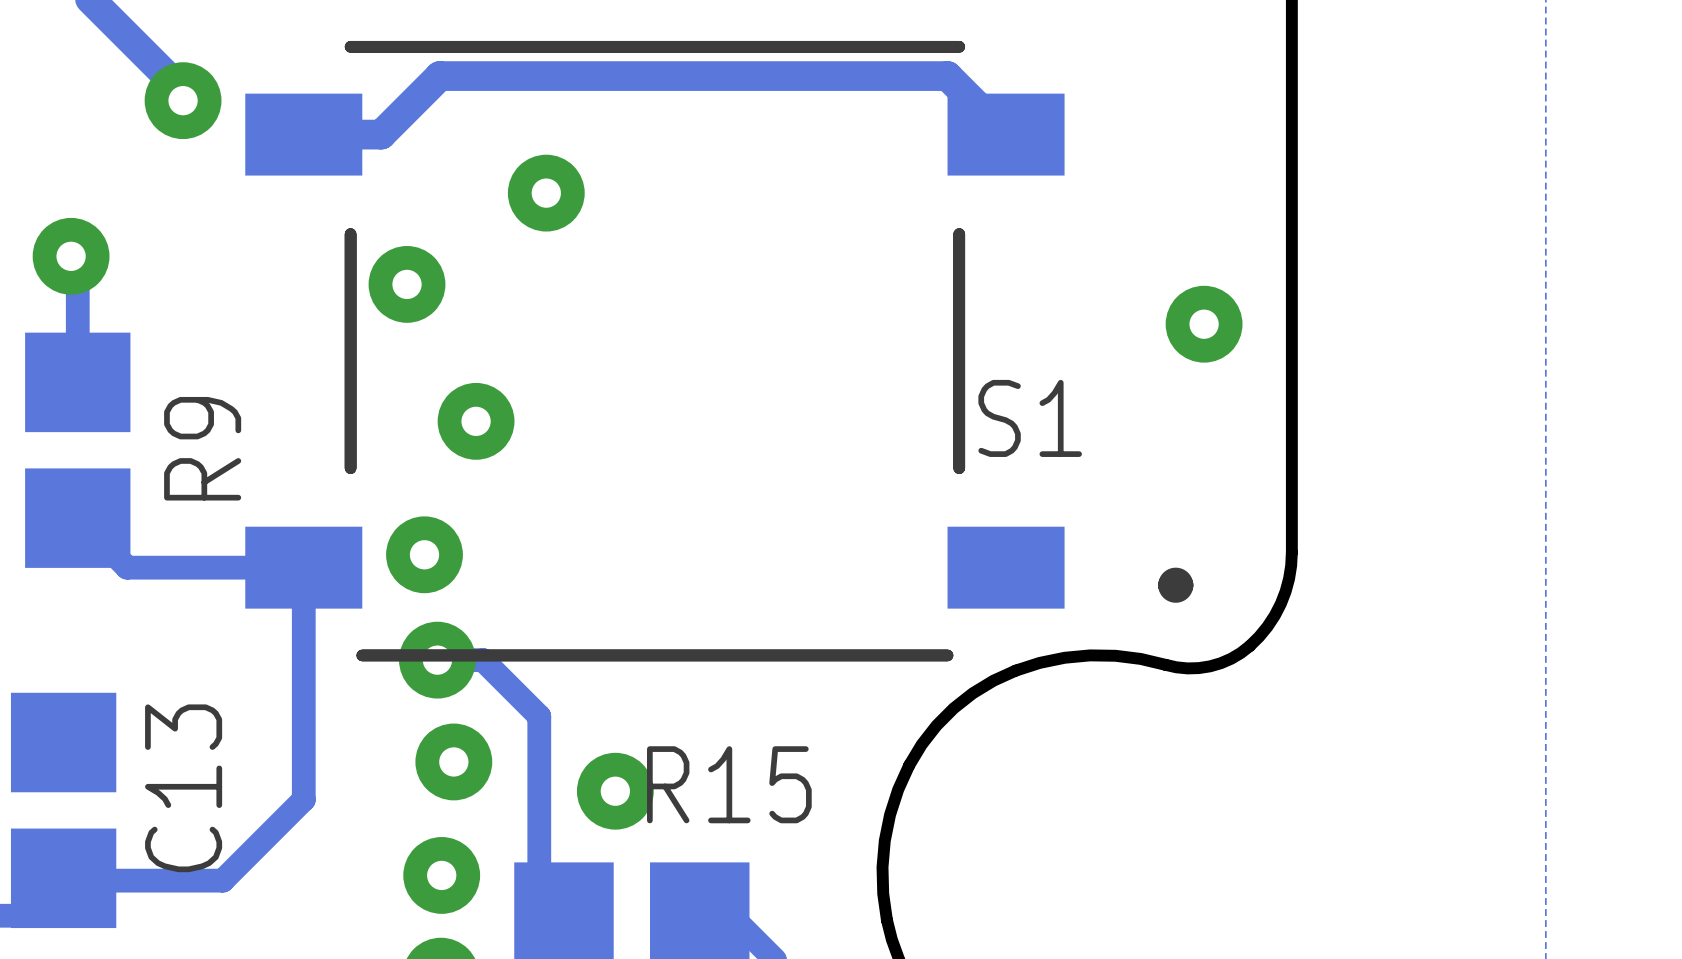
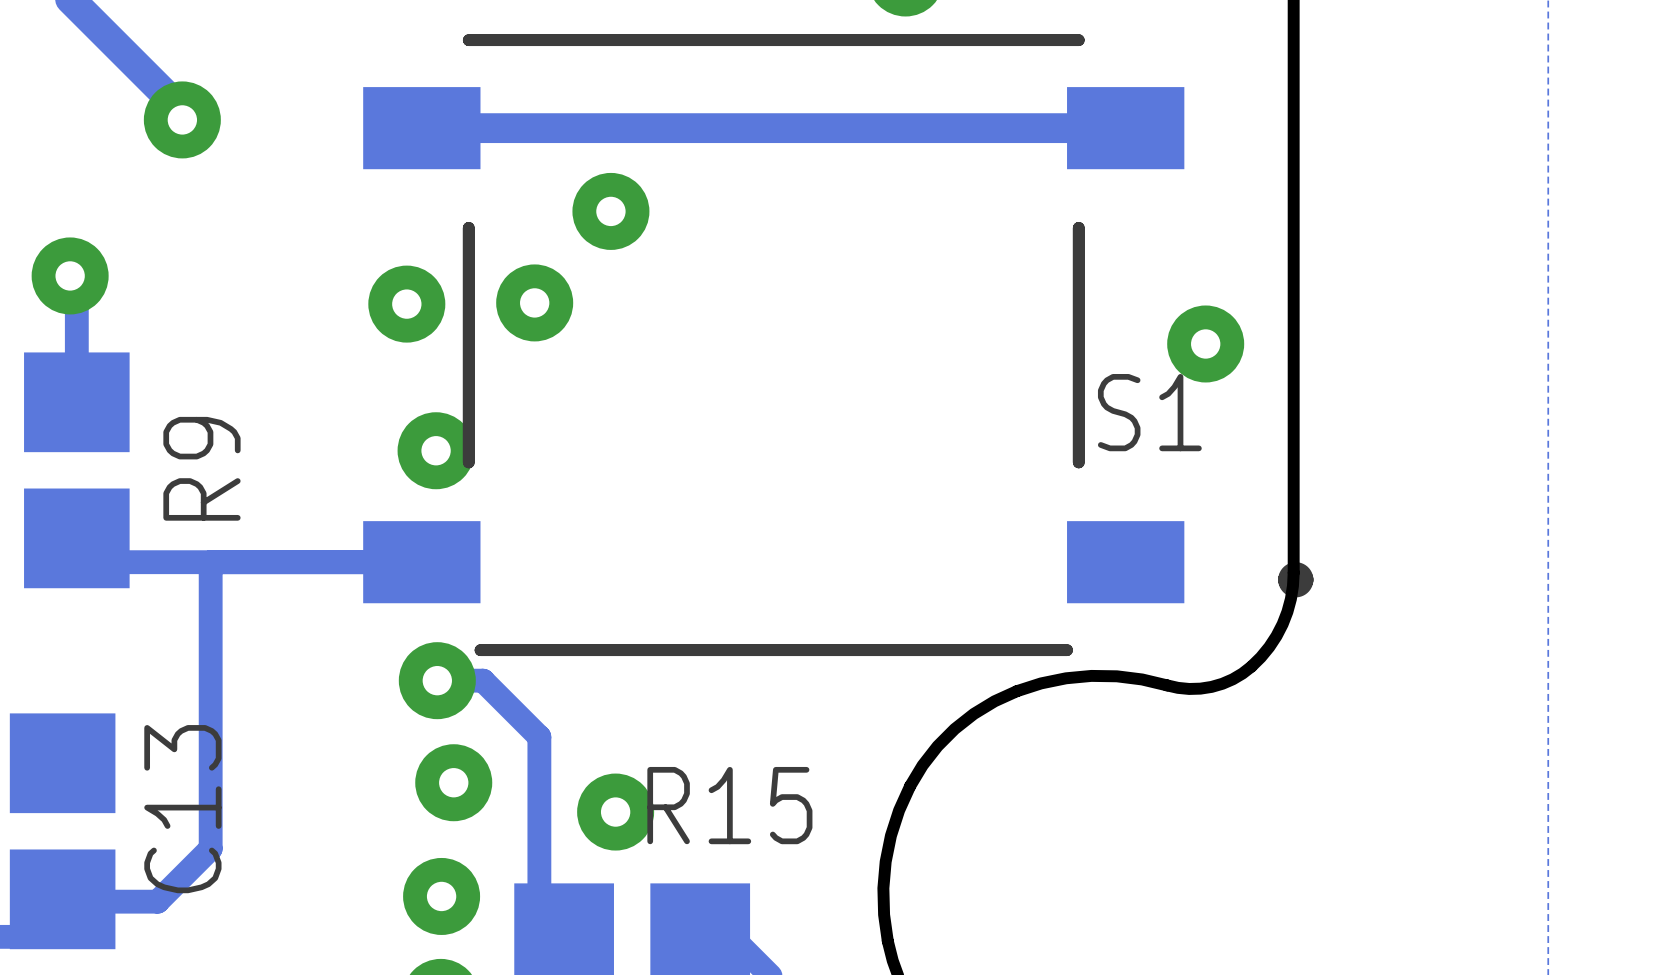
track: none -> (1125, 128) (421, 128)
track: (1006, 134) (947, 76) (439, 76) (381, 134) (303, 134) -> none
via position: (546, 193) -> (610, 211)
via: none -> (534, 302)
S1 position: (719, 351) -> (838, 345)
via position: (476, 421) -> (436, 450)
track: (101, 541) (127, 567) (303, 567) (303, 799) (222, 880) (158, 880) -> (210, 562) (210, 848) (157, 901)
track: none -> (421, 562) (100, 562)
via: (424, 554) -> none

